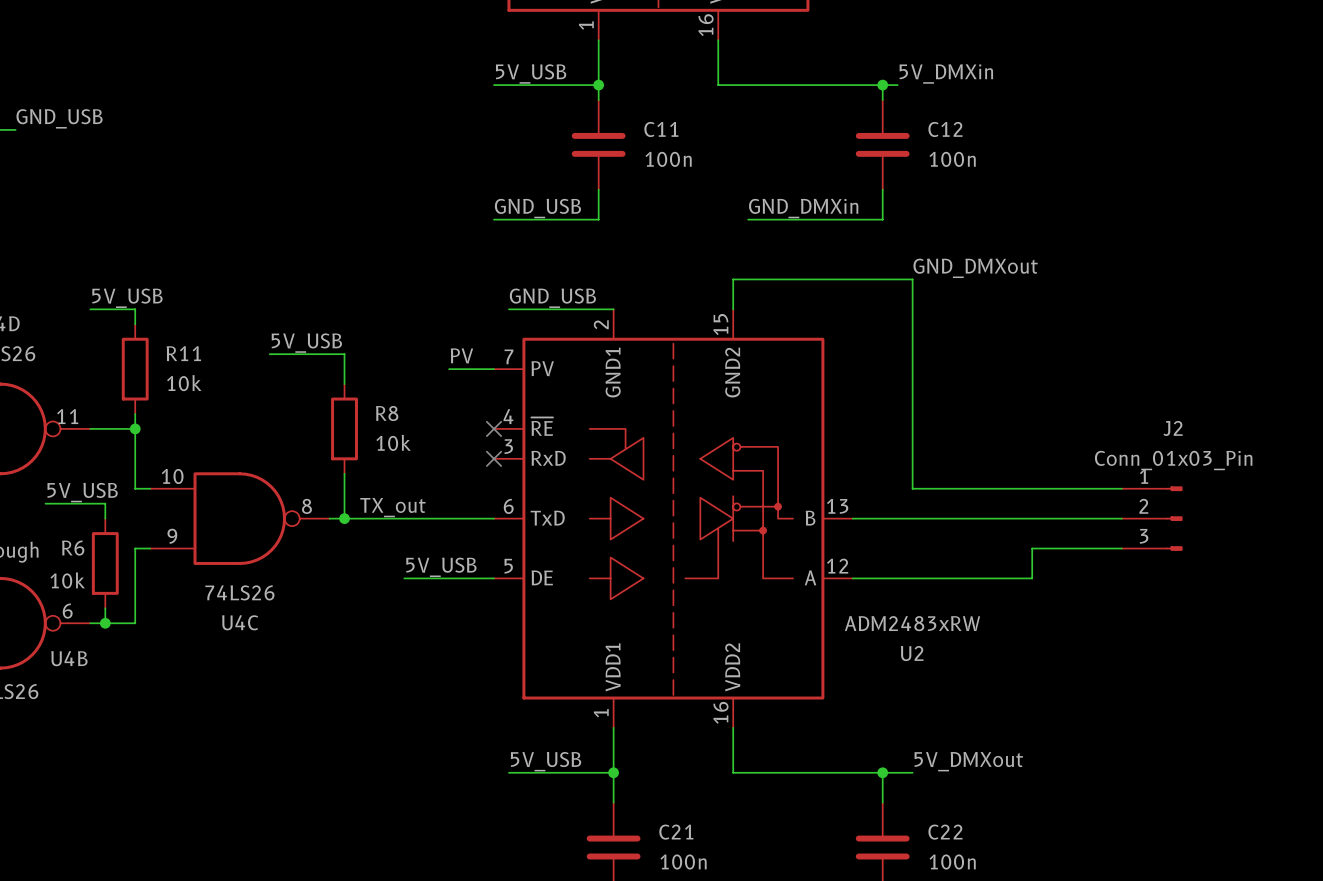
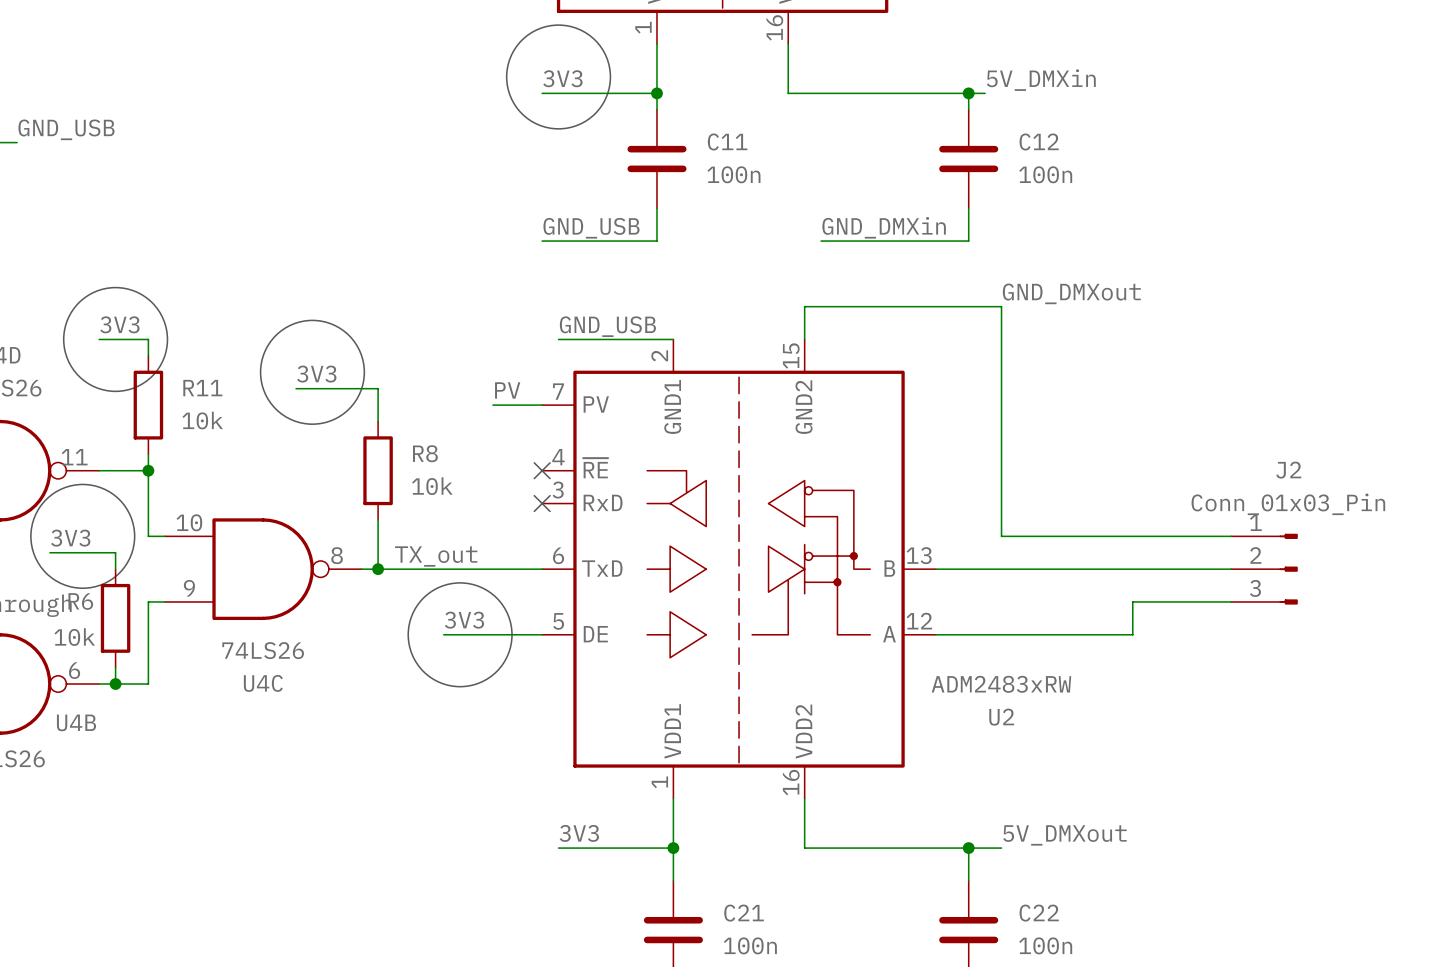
drawing: none -> [506, 25, 611, 129]
label: 5V_USB (531, 73) -> 3V3 (562, 78)
drawing: none -> [63, 287, 168, 392]
drawing: none -> [260, 320, 365, 425]
label: 5V_USB (127, 298) -> 3V3 (119, 324)
label: 5V_USB (306, 343) -> 3V3 (316, 374)
drawing: none -> [30, 484, 135, 589]
label: 5V_USB (82, 492) -> 3V3 (70, 538)
drawing: none -> [408, 582, 513, 687]
label: 5V_USB (441, 567) -> 3V3 (464, 620)
label: 5V_USB (546, 761) -> 3V3 (579, 833)

